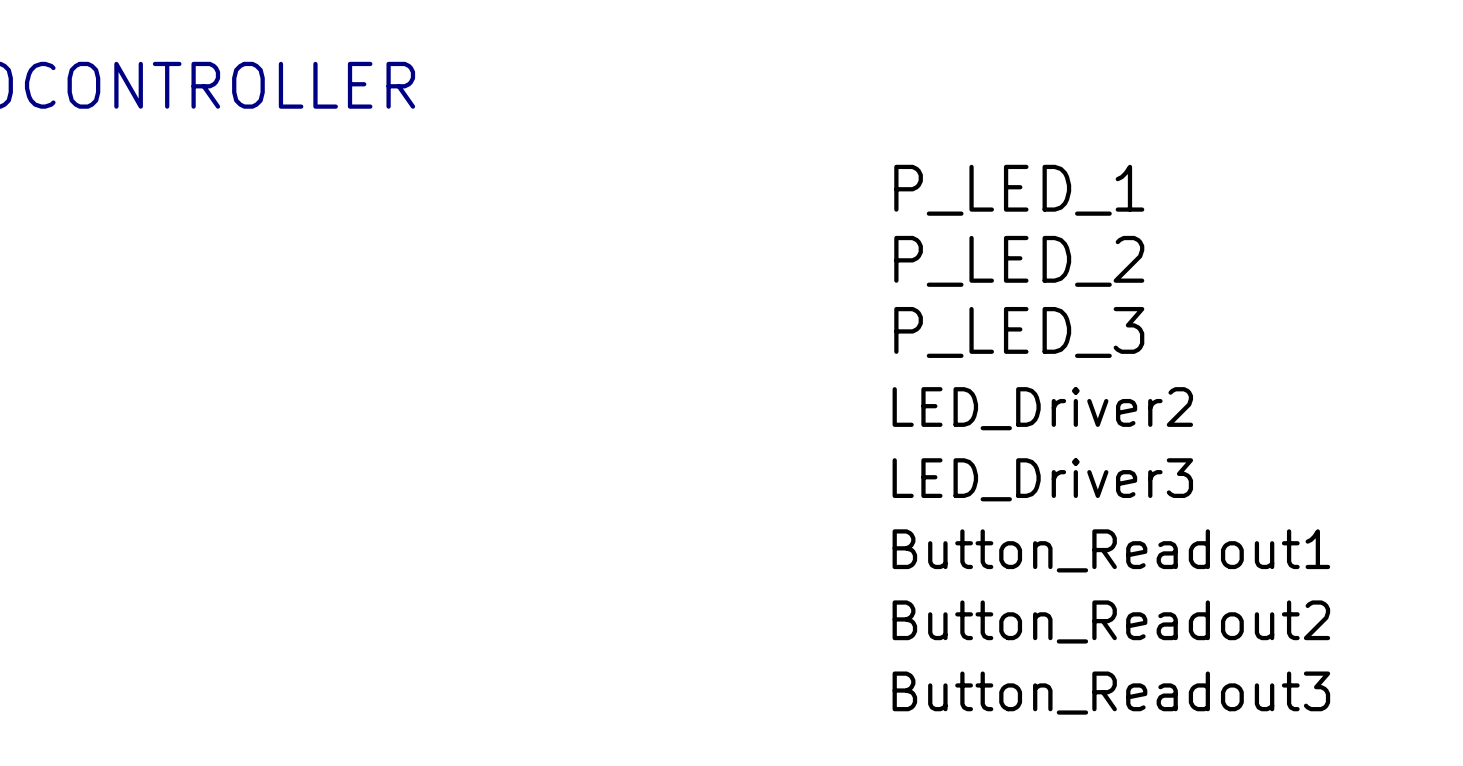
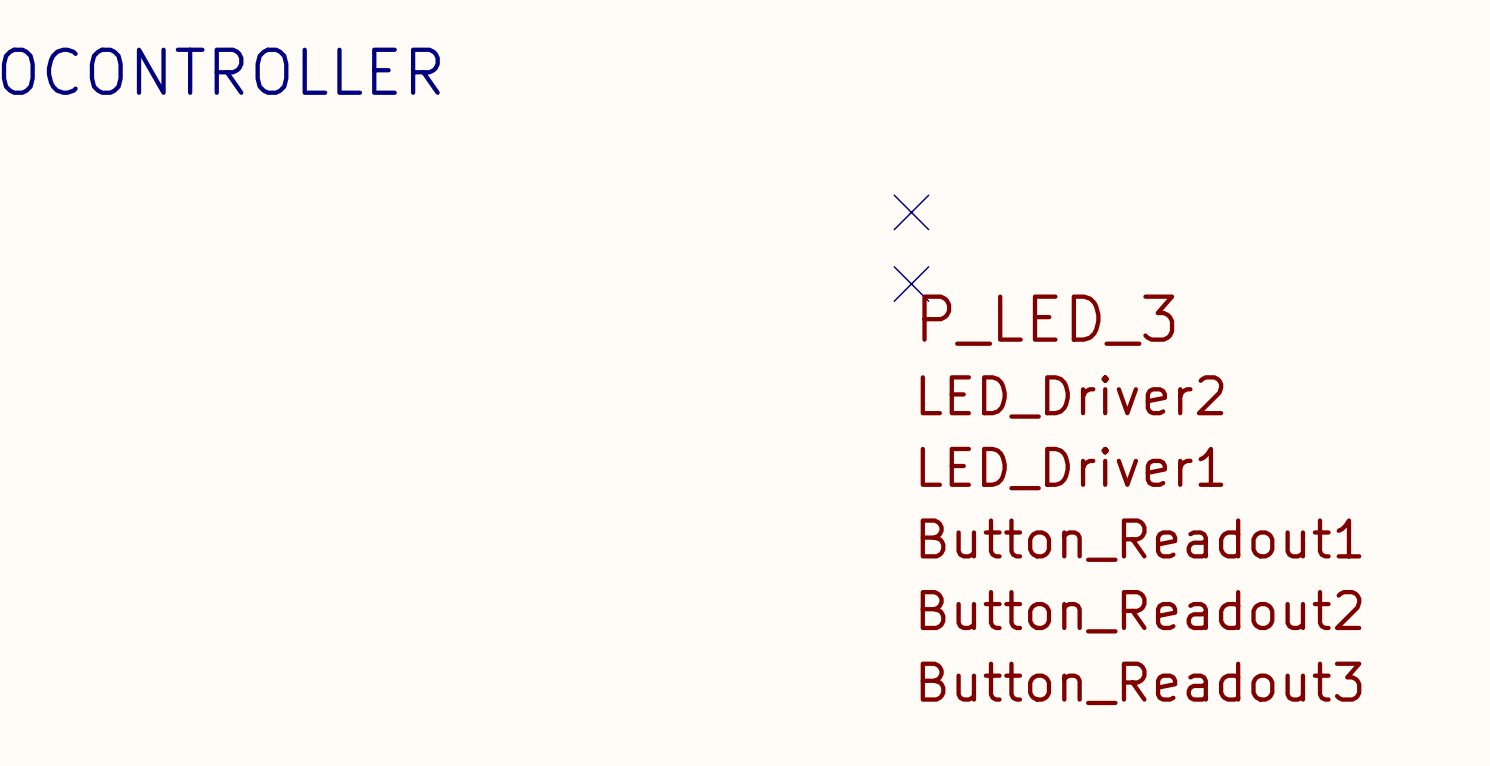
label: P_LED_1 (1019, 190) -> none
no-connect mark: none -> (911, 212)
label: P_LED_2 (1019, 261) -> none
no-connect mark: none -> (911, 284)
label: LED_Driver3 (1042, 479) -> LED_Driver1 (1071, 468)

